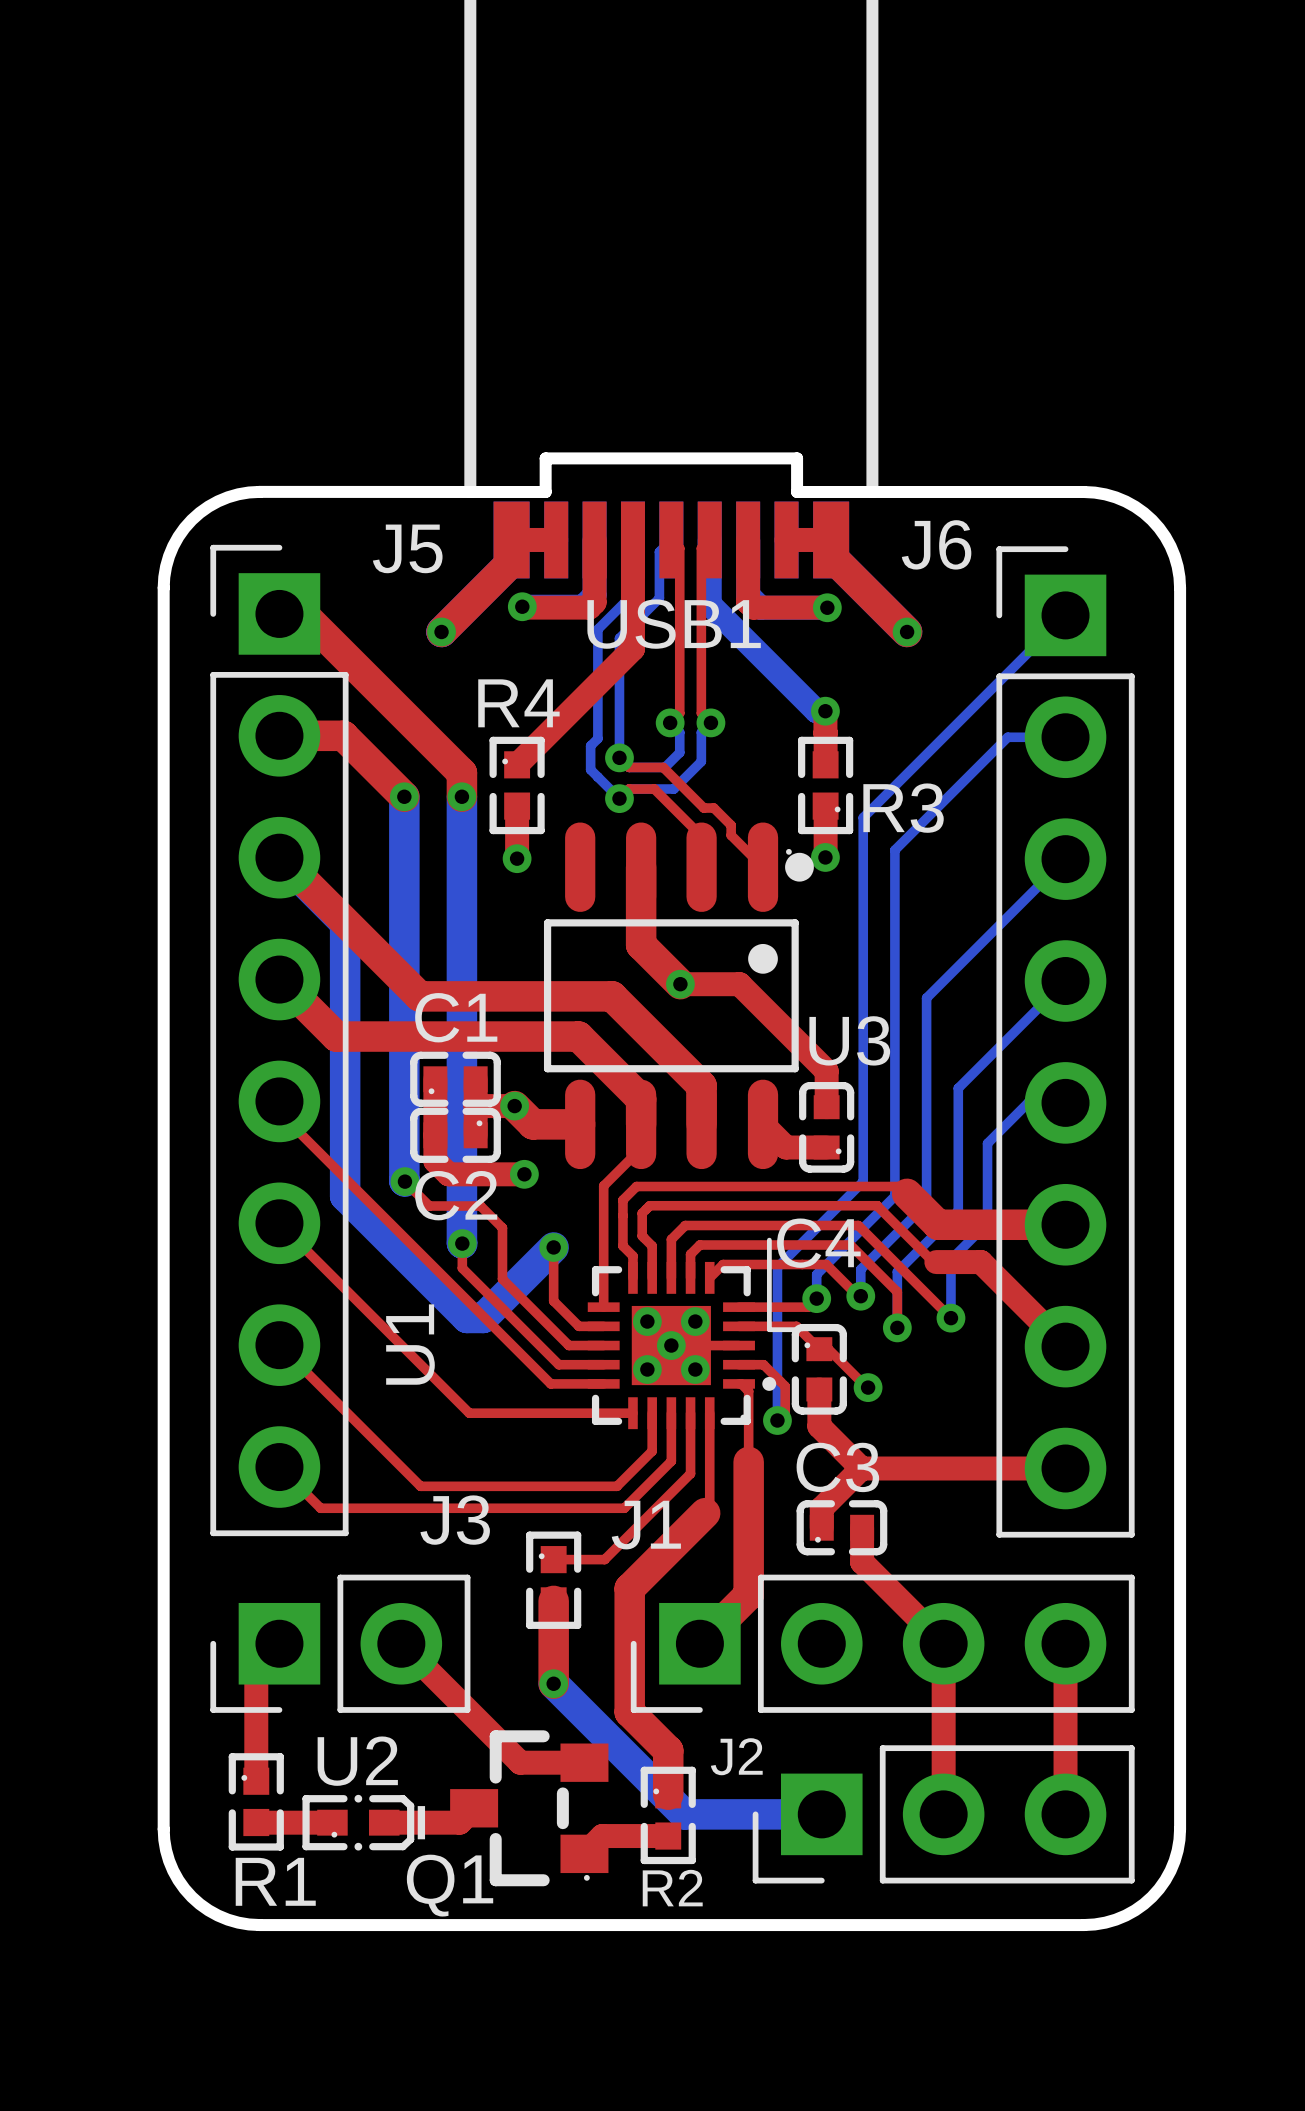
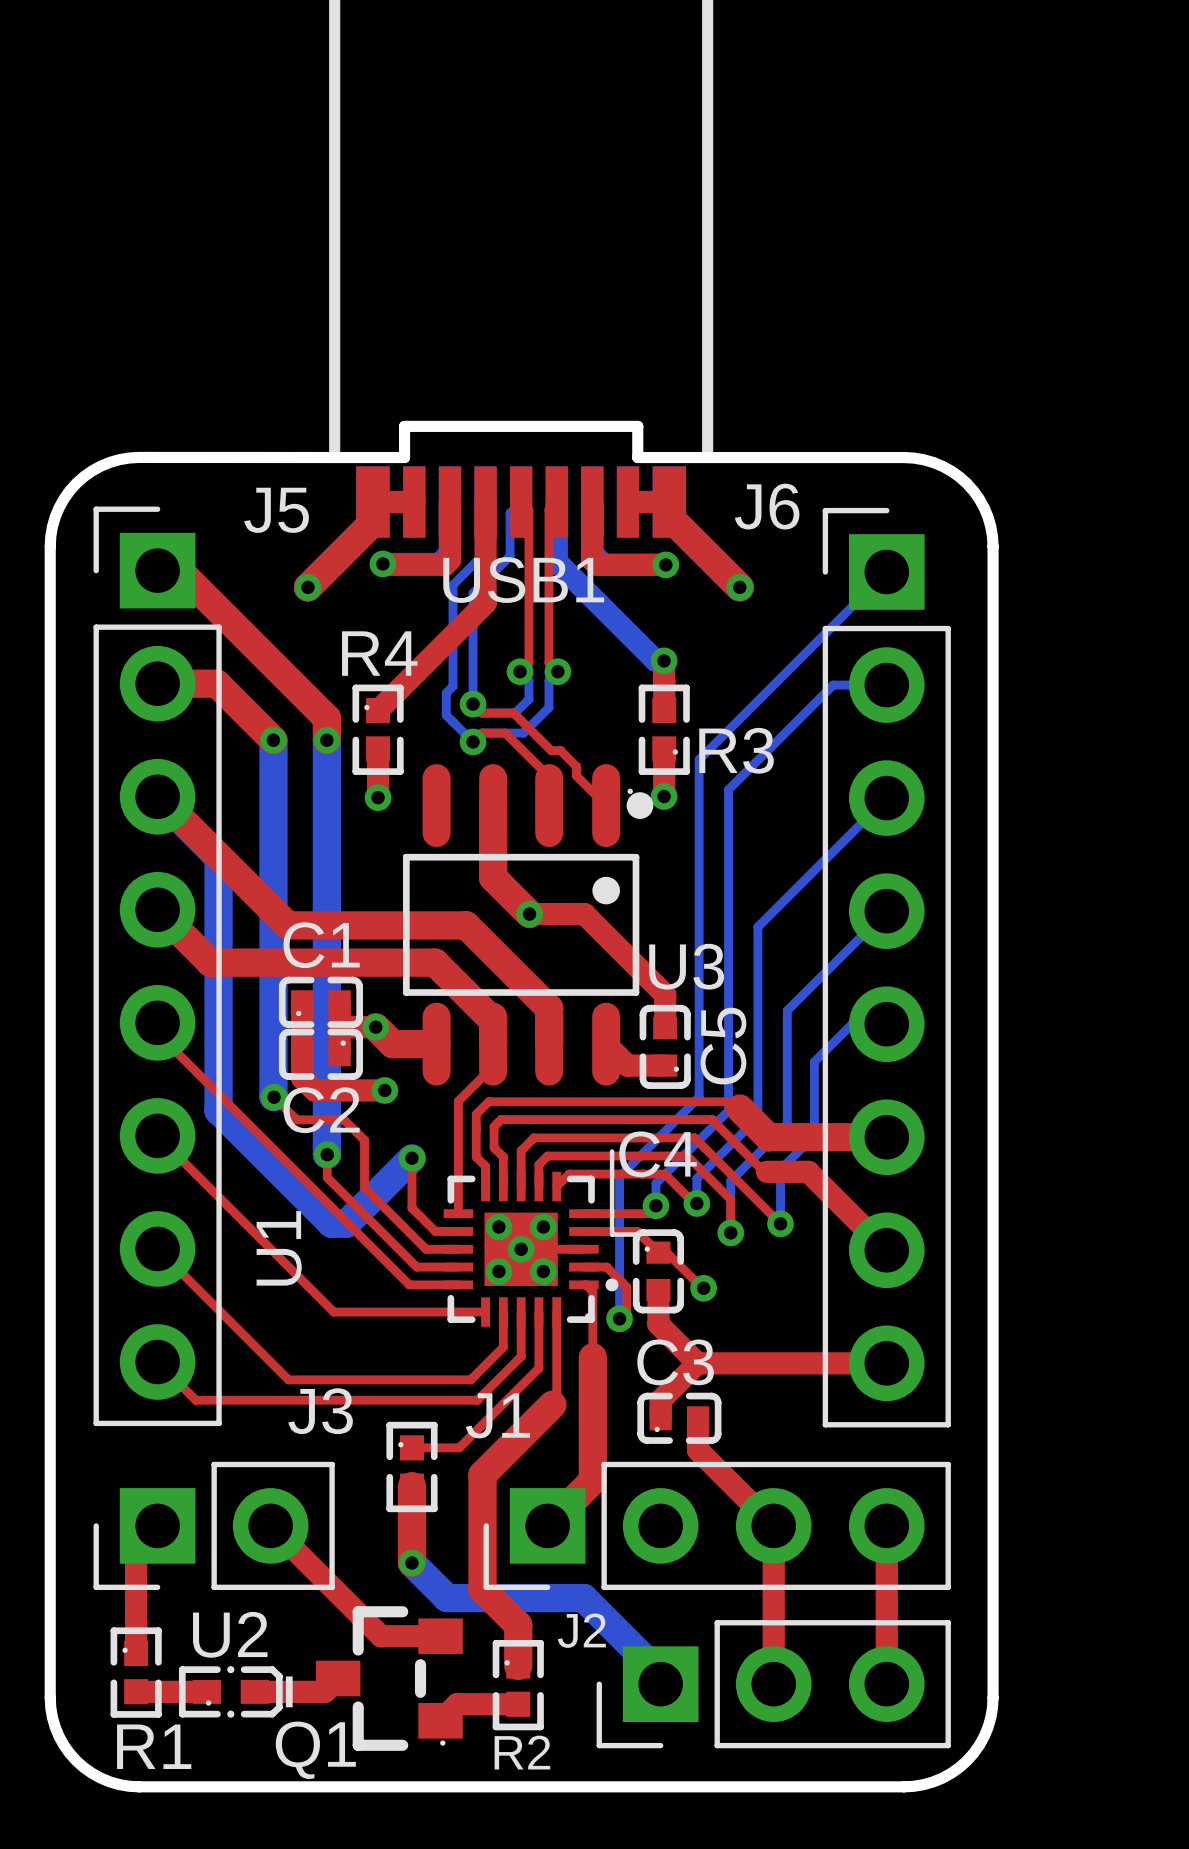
C5 name: none -> C5 (723, 1046)
bottom track: (591, 1721) (684, 1814) (821, 1814) -> (447, 1598) (583, 1598) (660, 1674) (660, 1684)

